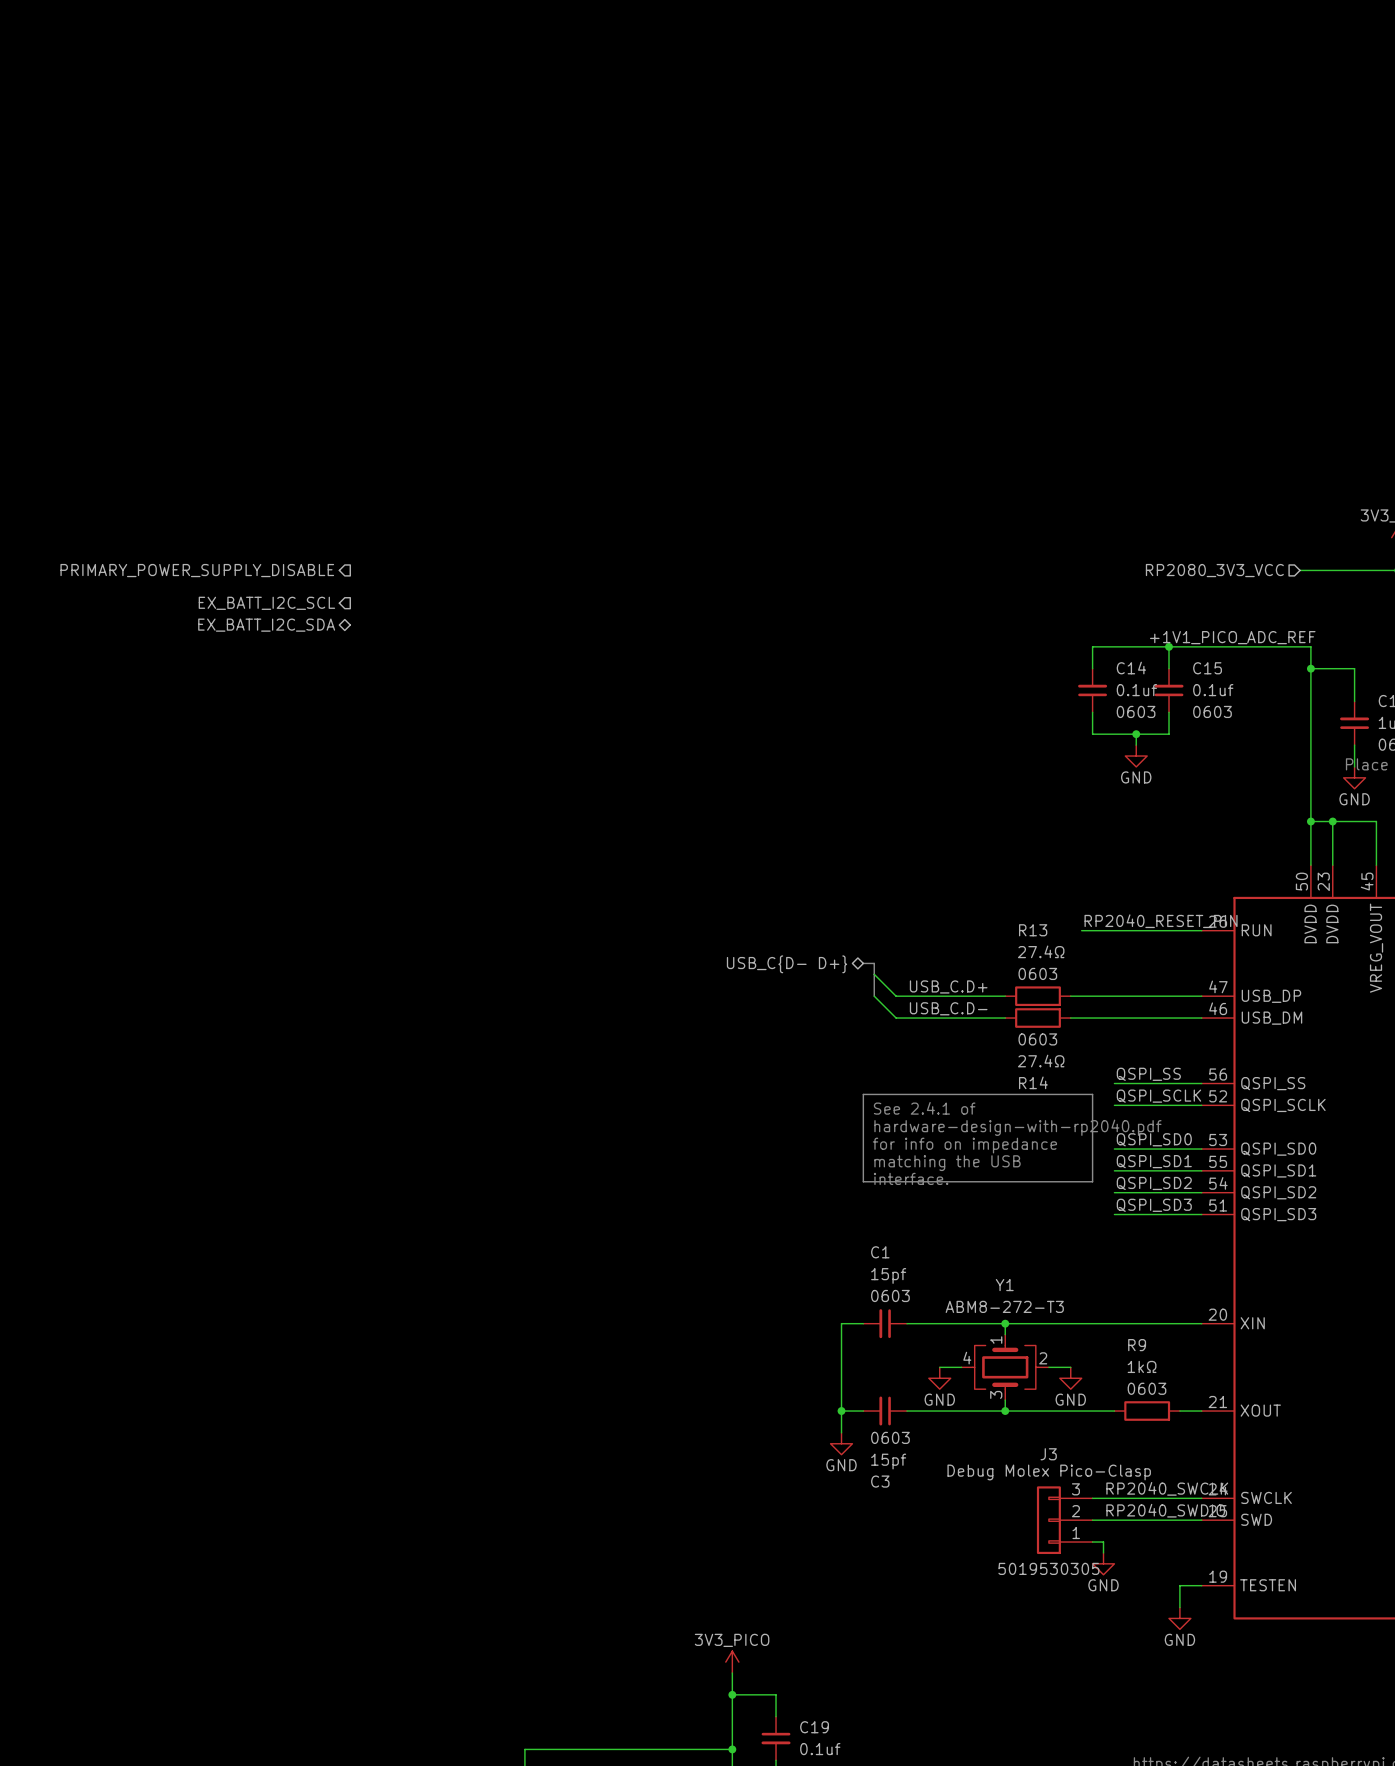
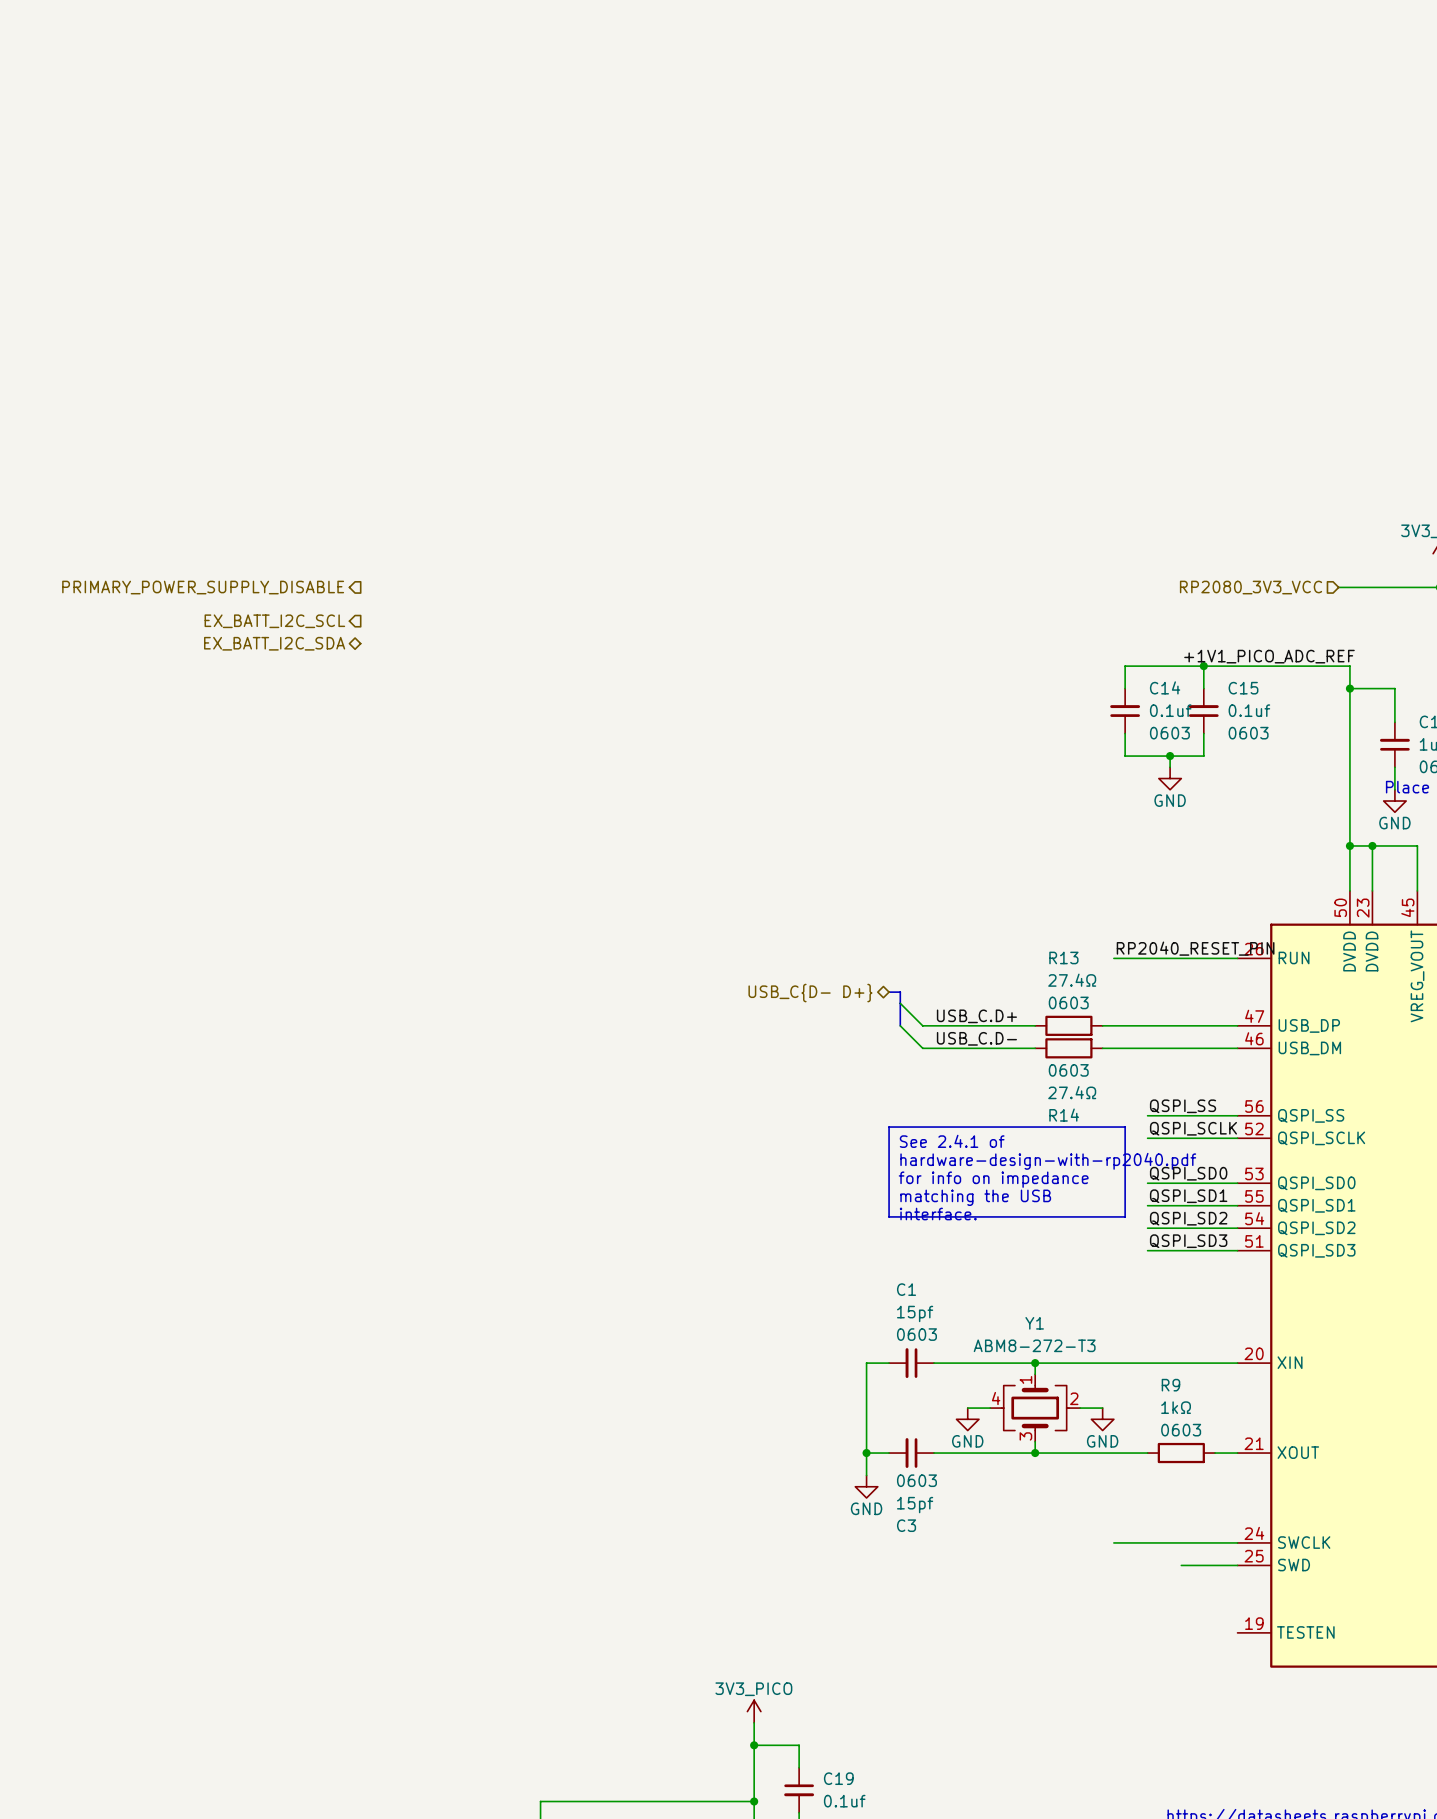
label: RP2040_SWCLK (1167, 1488) -> none
label: RP2040_SWDIO (1165, 1510) -> none
J3: 5019530305 (1064, 1520) -> none
wire: (1092, 1520) (1147, 1520) -> none
wire: (1092, 1542) (1103, 1542) (1103, 1552) -> none
power symbol: GND (1103, 1563) -> none
wire: (1201, 1585) (1179, 1585) (1179, 1607) -> none
power symbol: GND (1179, 1618) -> none

